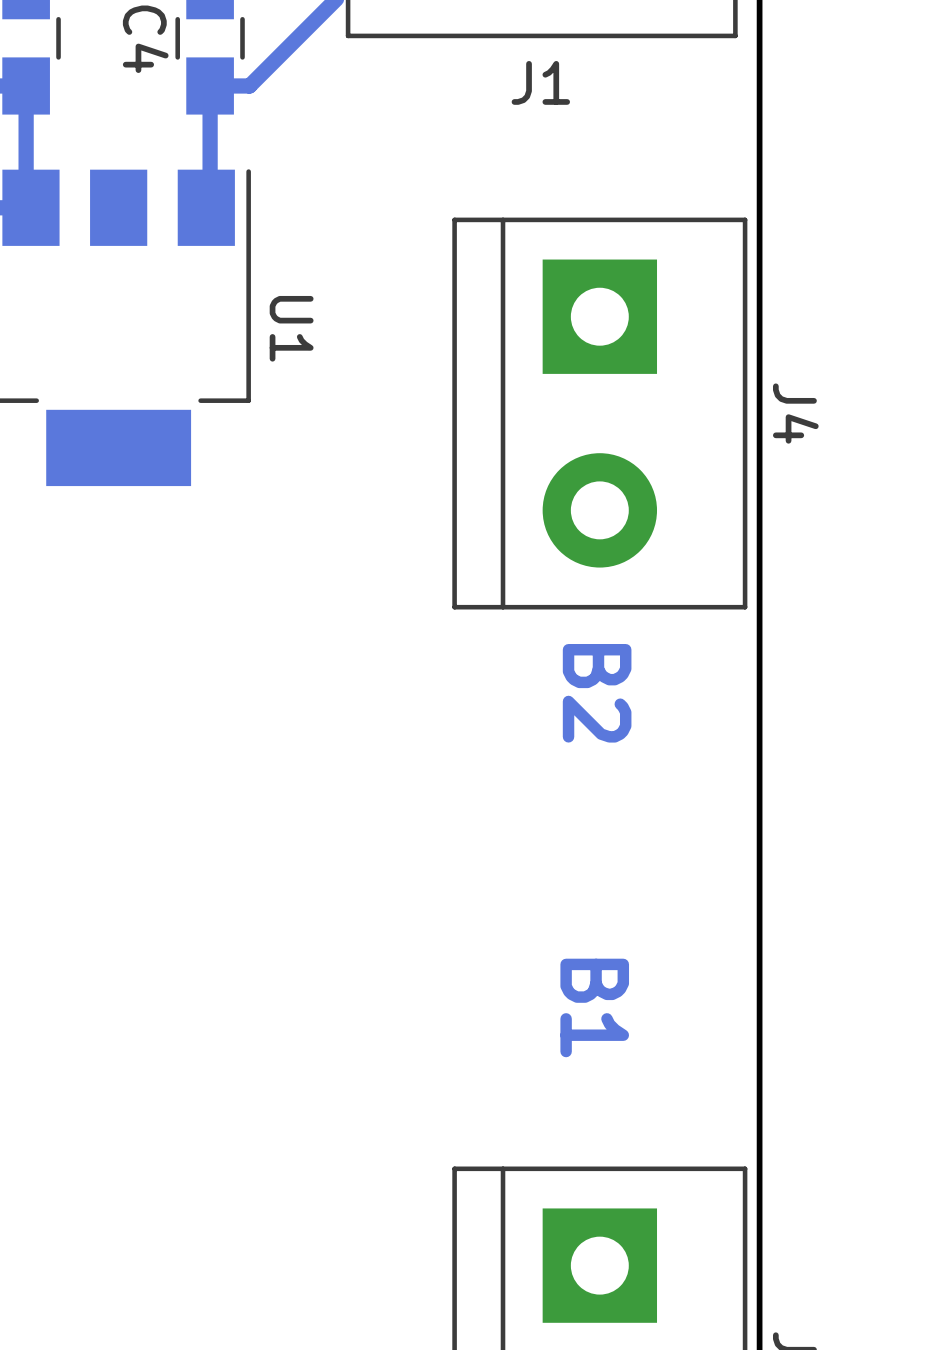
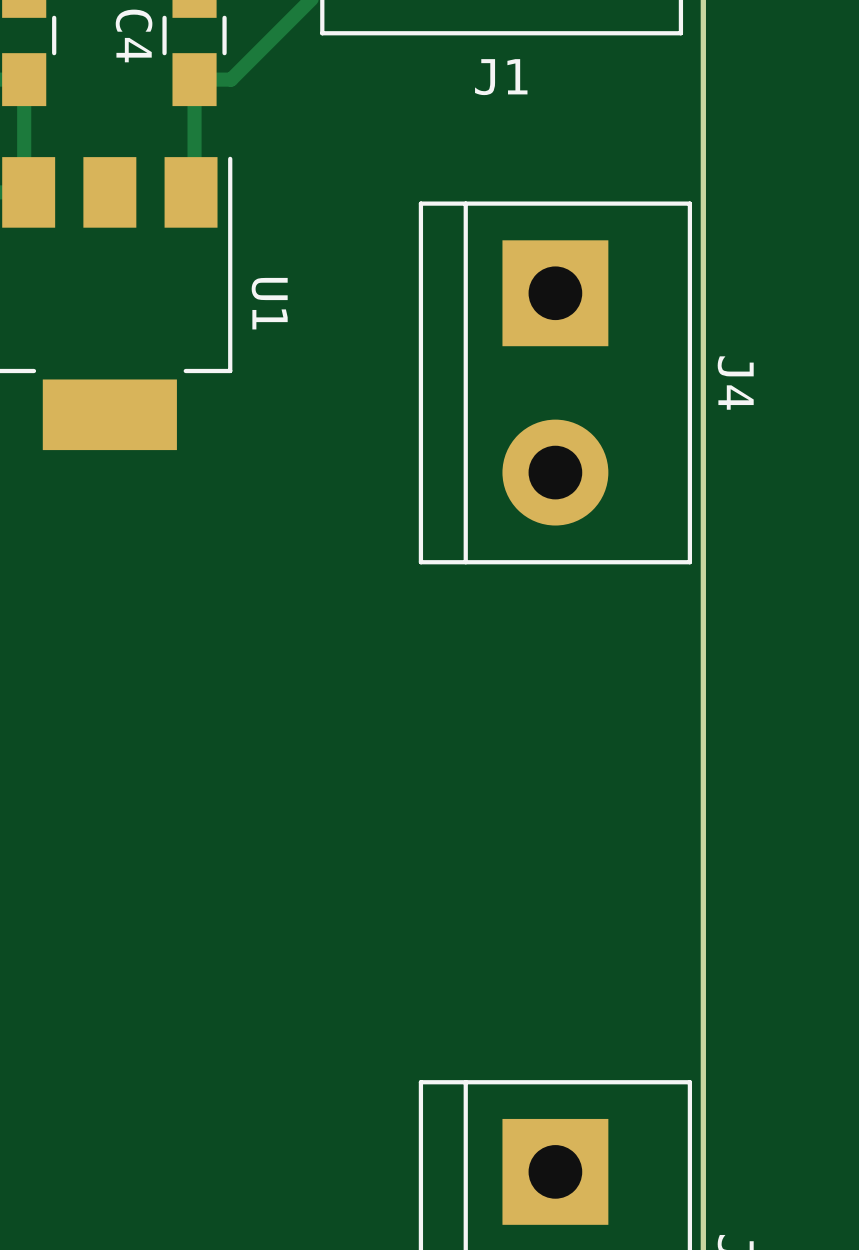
text: B2 (597, 693) -> none
text: B1 (594, 1007) -> none

